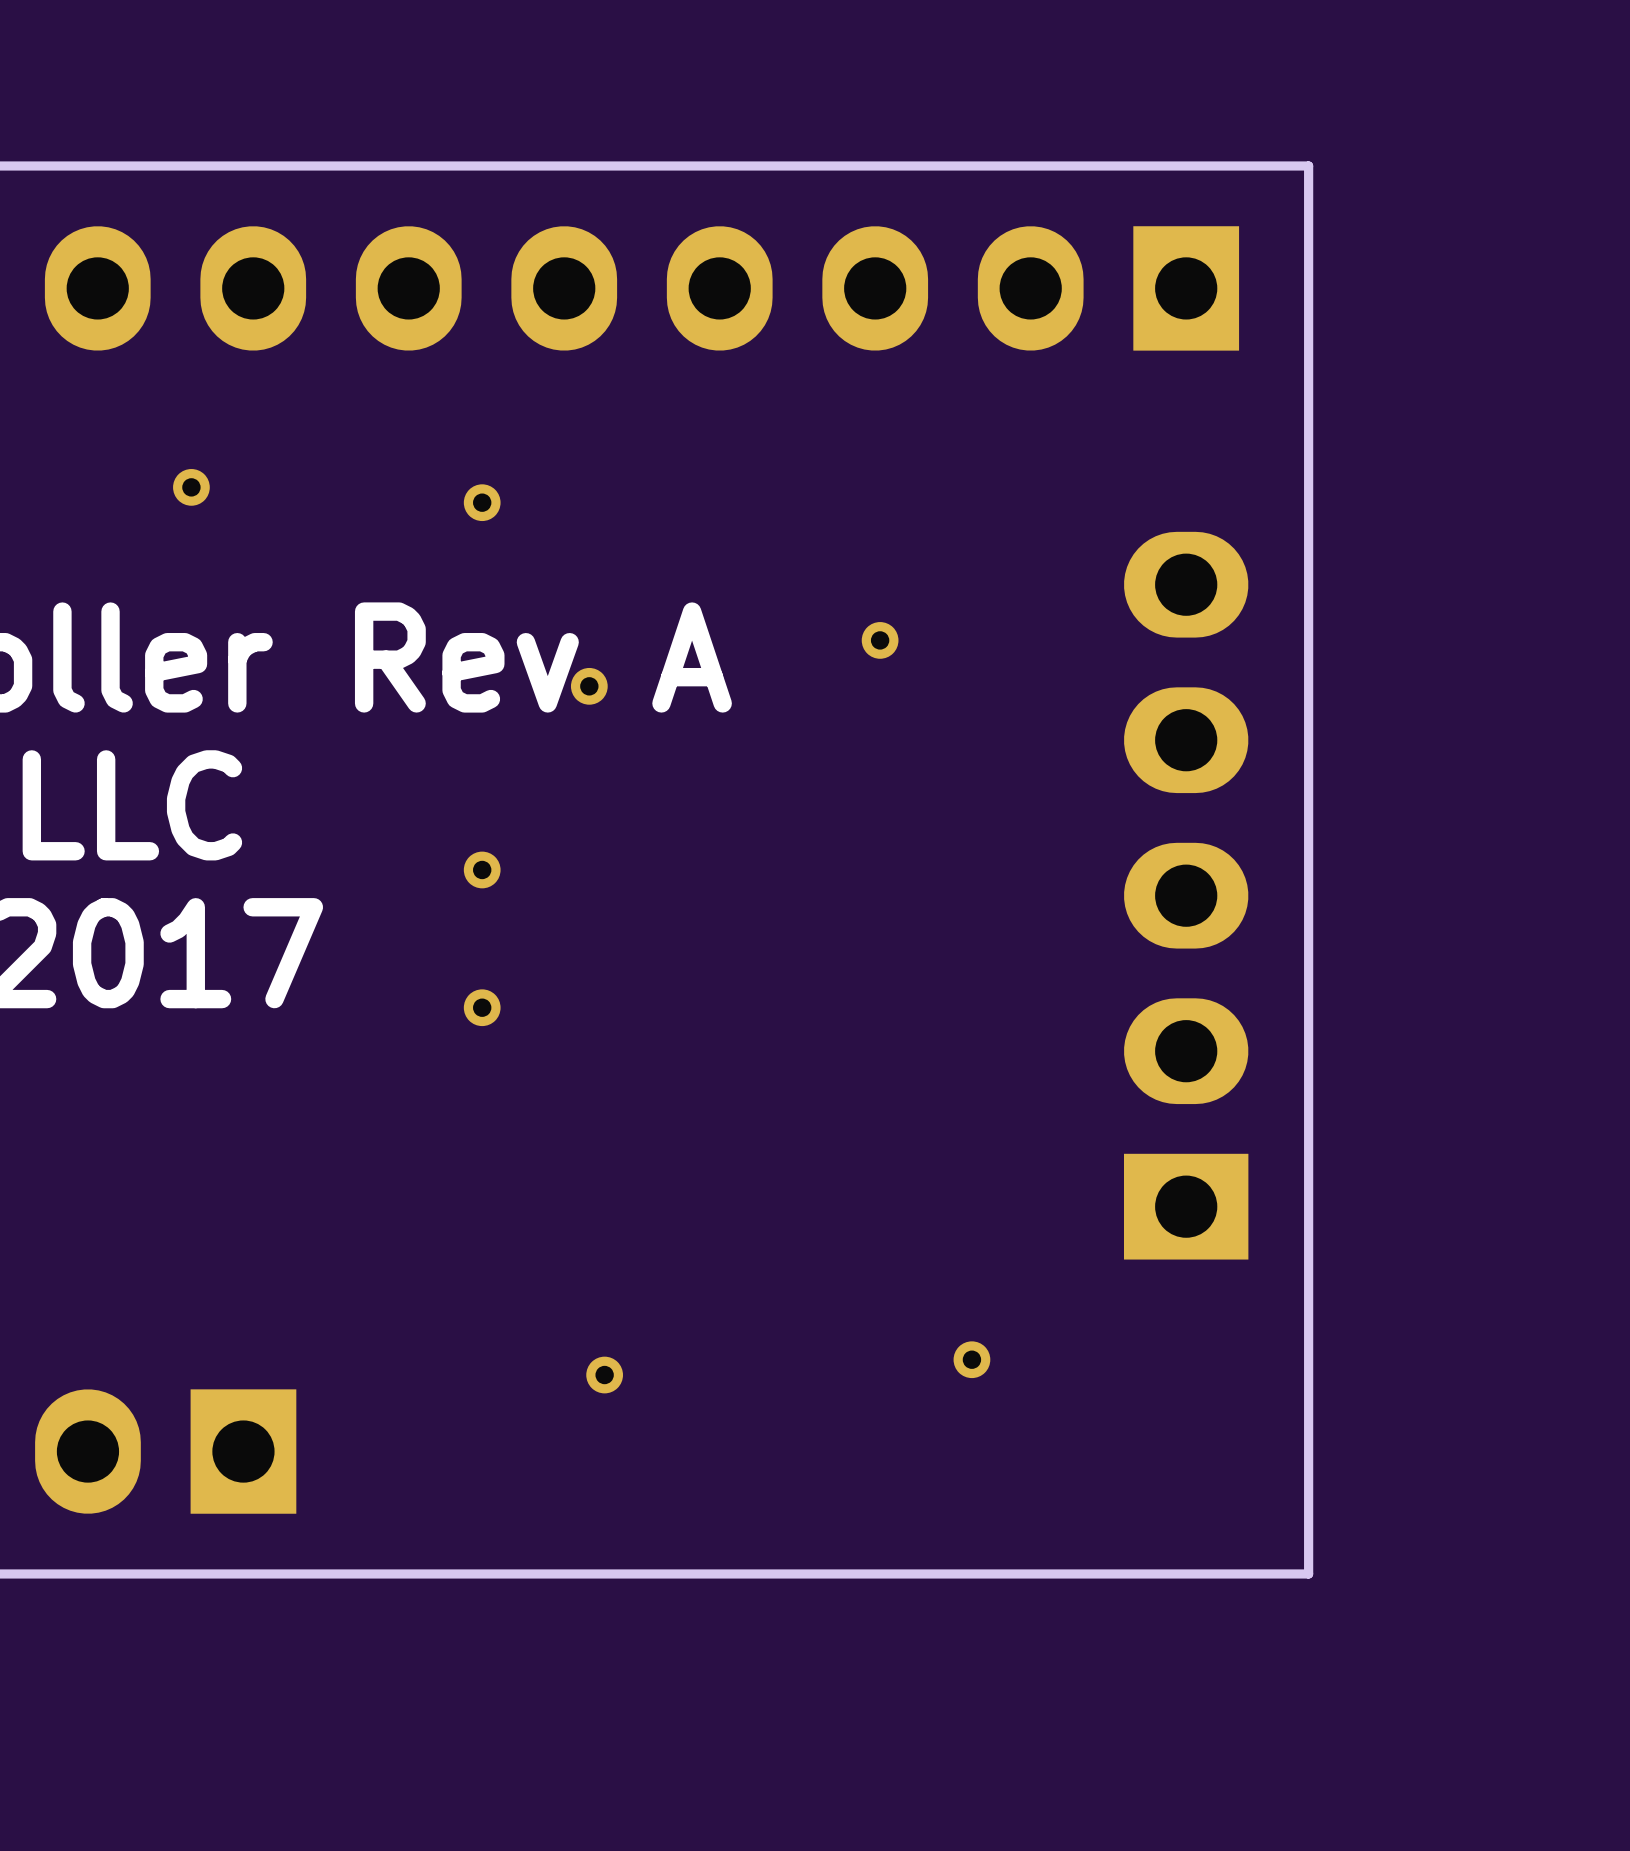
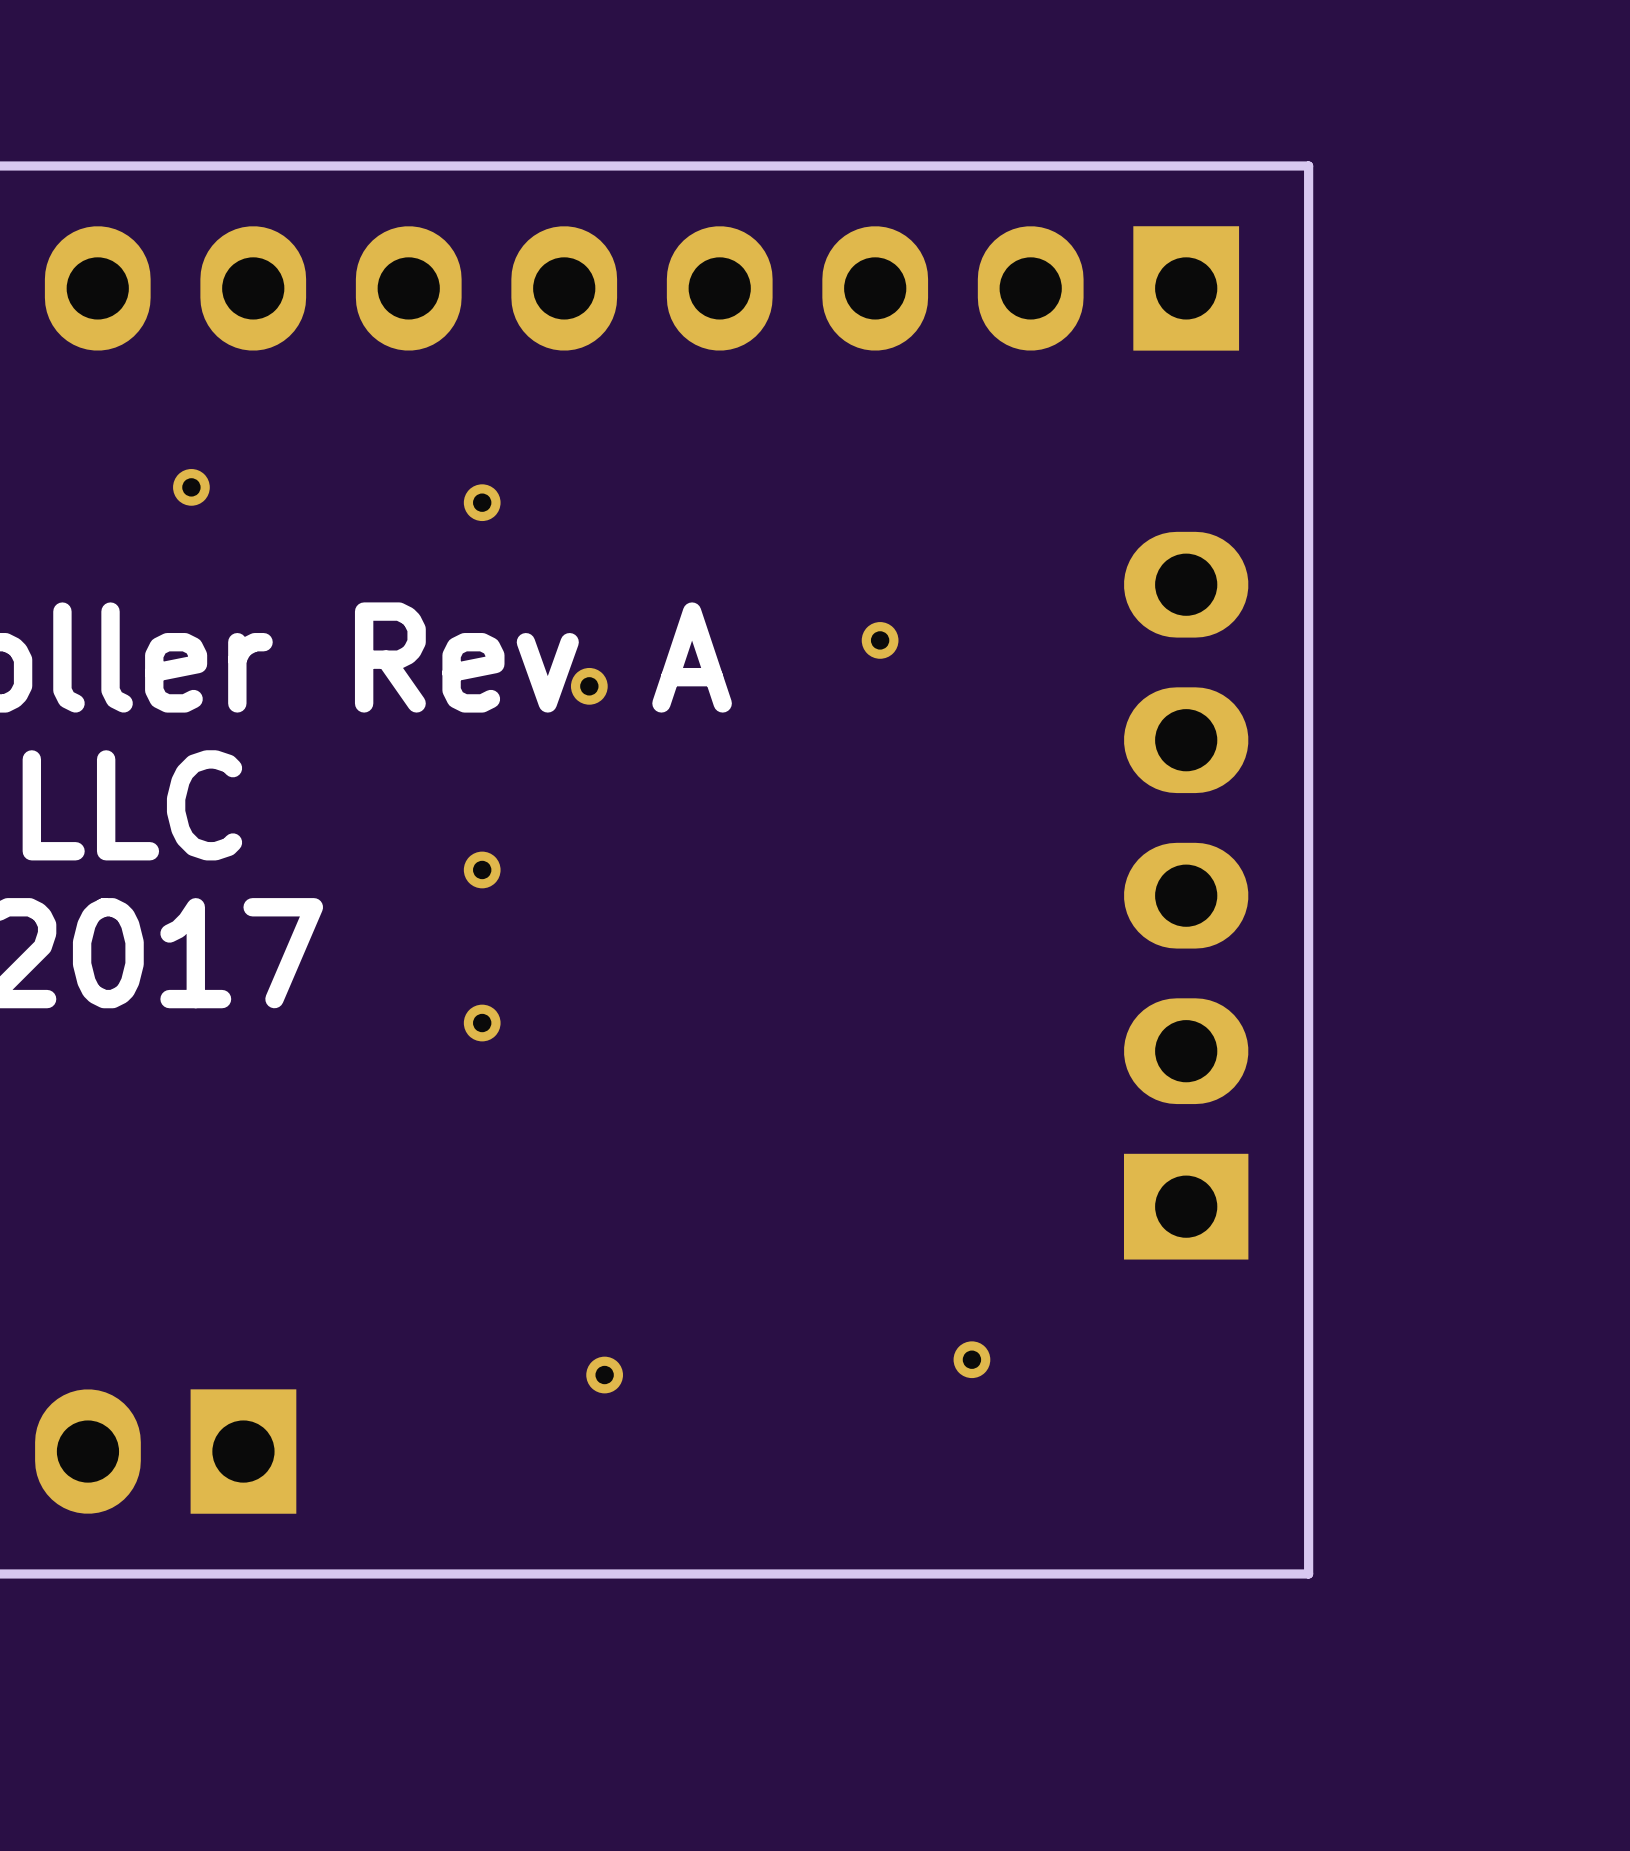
part position: (482, 1007) -> (482, 1023)

